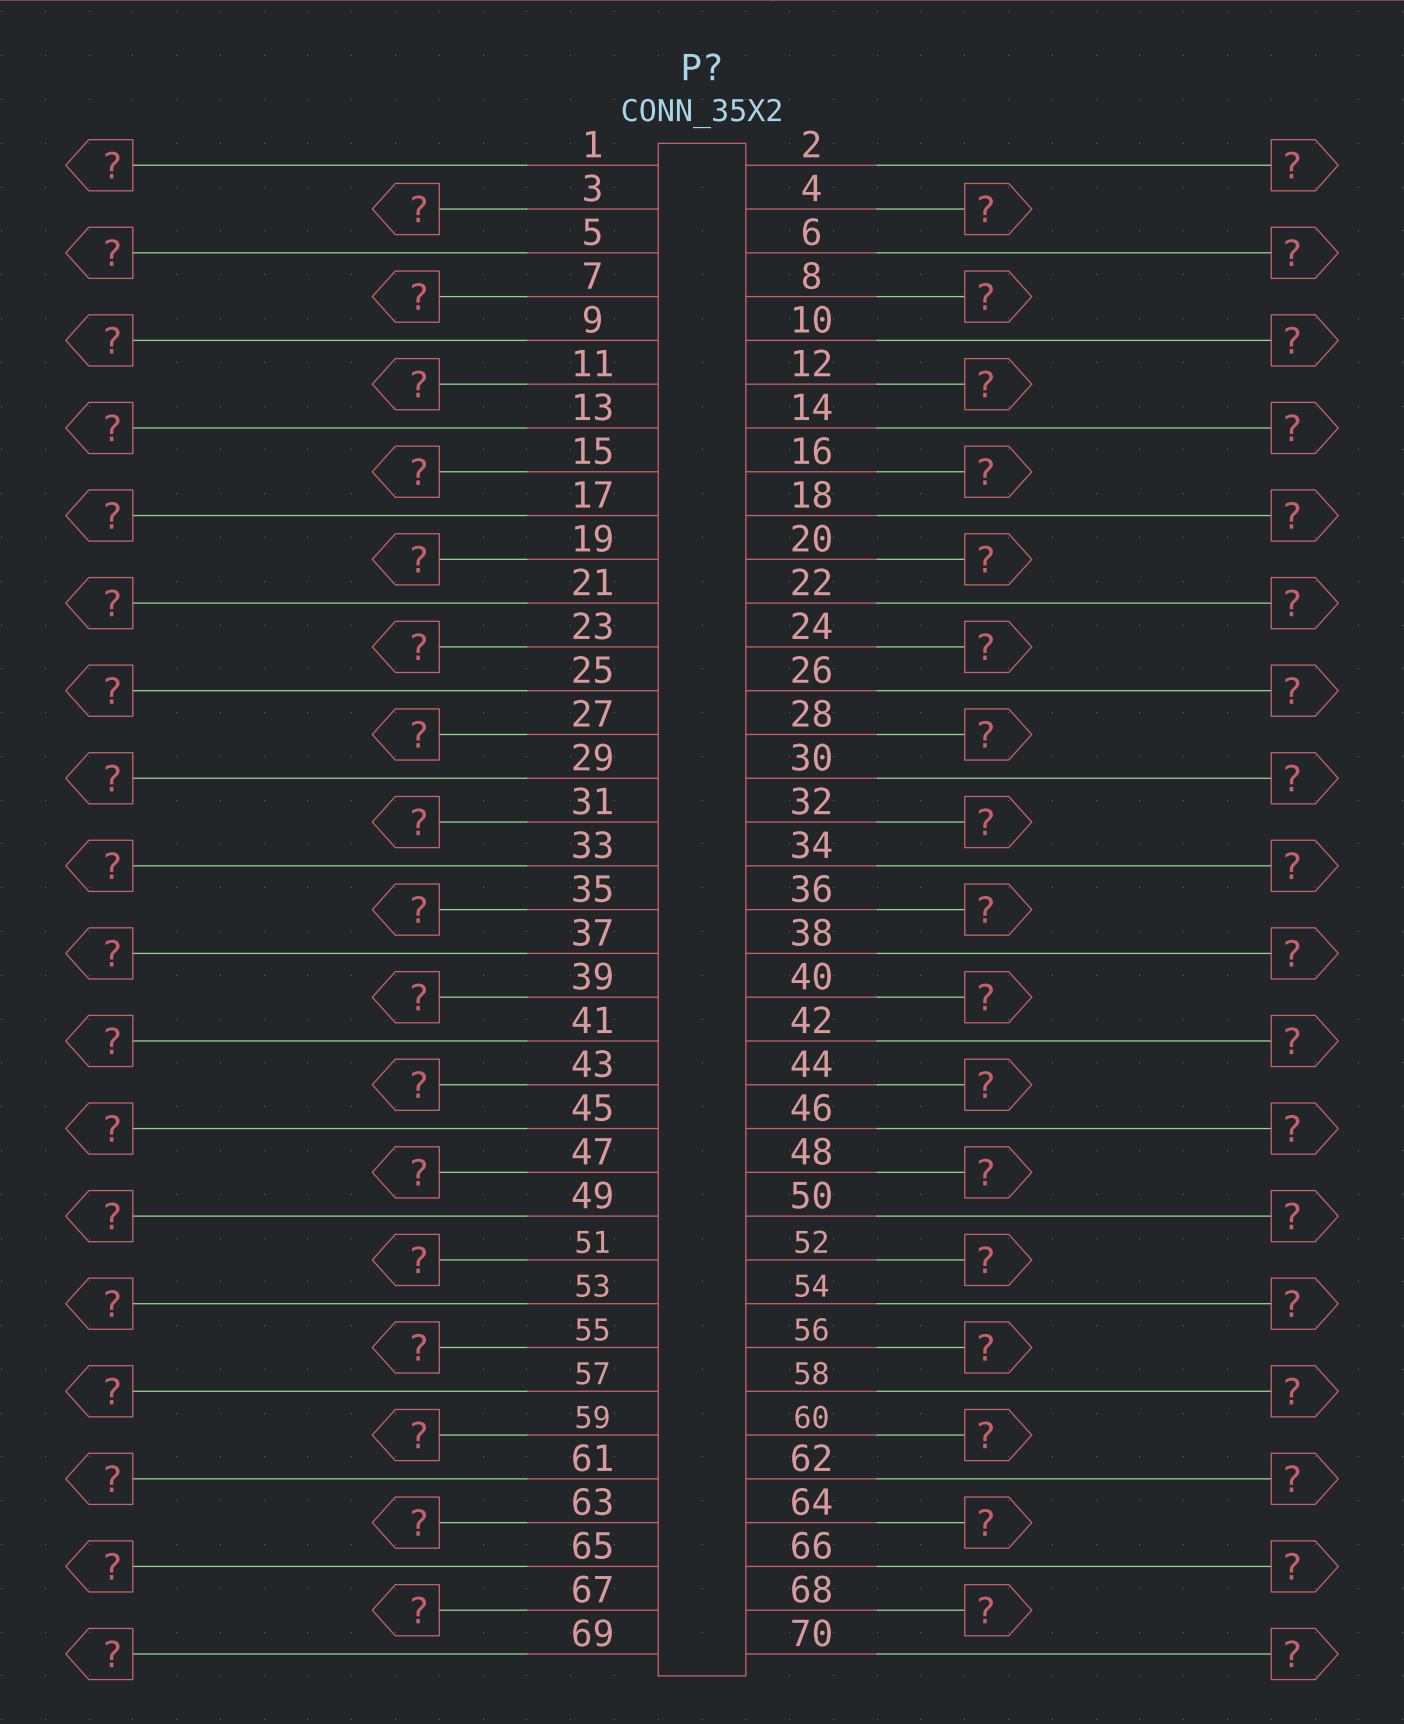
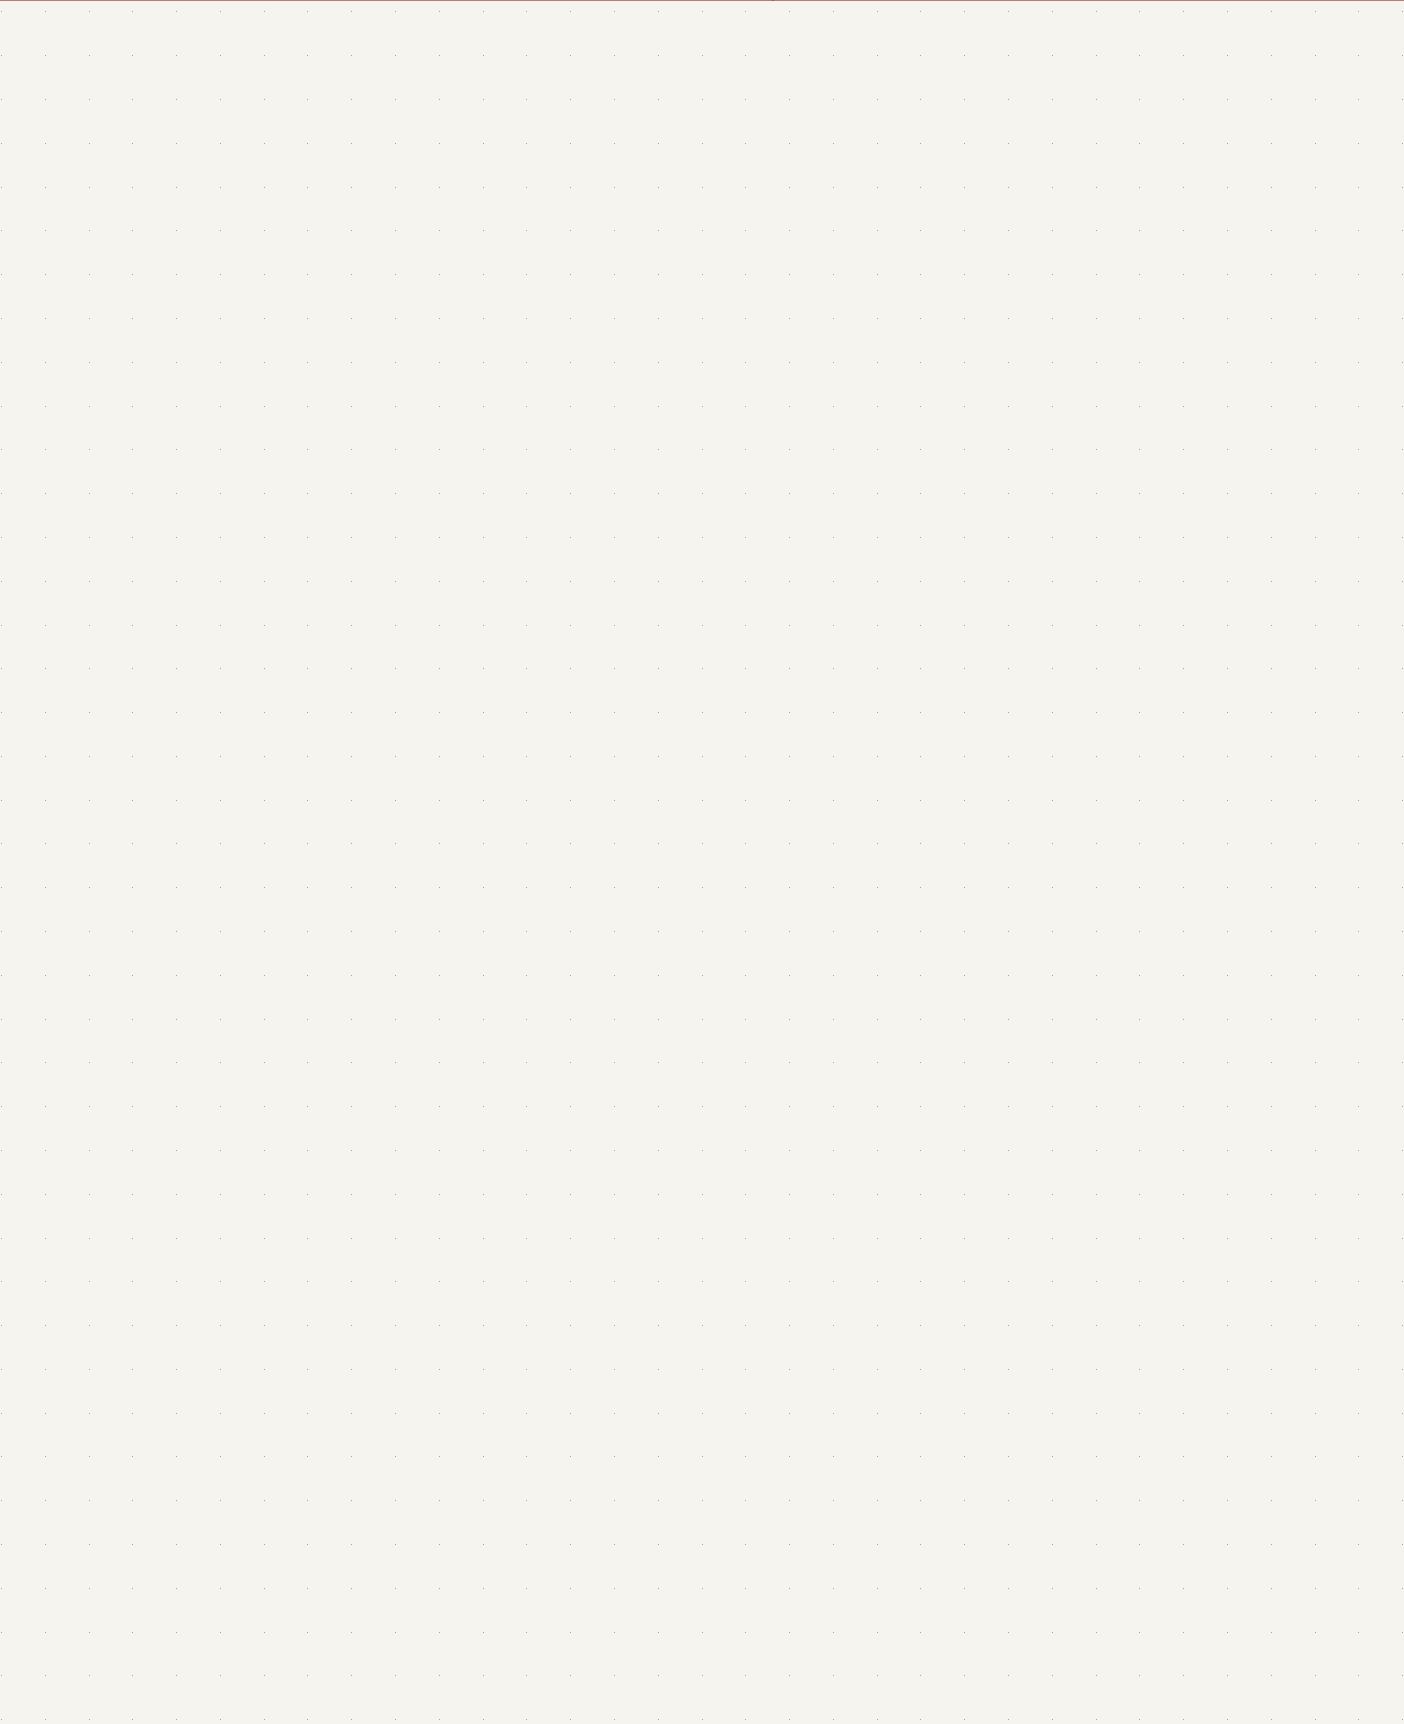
global label: ? (112, 165) -> none
wire: (132, 165) (526, 165) -> none
wire: (877, 165) (1271, 165) -> none
global label: ? (1292, 165) -> none
global label: ? (419, 208) -> none
global label: ? (985, 208) -> none
wire: (439, 209) (526, 209) -> none
wire: (877, 209) (964, 209) -> none
global label: ? (112, 252) -> none
wire: (132, 252) (526, 252) -> none
wire: (877, 252) (1271, 252) -> none
global label: ? (1292, 252) -> none
global label: ? (419, 296) -> none
wire: (439, 296) (526, 296) -> none
wire: (877, 296) (964, 296) -> none
global label: ? (985, 296) -> none
global label: ? (112, 340) -> none
wire: (132, 340) (526, 340) -> none
wire: (877, 340) (1271, 340) -> none
global label: ? (1292, 340) -> none
global label: ? (419, 383) -> none
global label: ? (985, 383) -> none
wire: (439, 384) (526, 384) -> none
wire: (877, 384) (964, 384) -> none
global label: ? (112, 427) -> none
wire: (132, 427) (526, 427) -> none
wire: (877, 427) (1271, 427) -> none
global label: ? (1292, 427) -> none
global label: ? (419, 471) -> none
wire: (439, 471) (526, 471) -> none
wire: (877, 471) (964, 471) -> none
global label: ? (985, 471) -> none
global label: ? (112, 515) -> none
wire: (132, 515) (526, 515) -> none
wire: (877, 515) (1271, 515) -> none
global label: ? (1292, 515) -> none
global label: ? (419, 559) -> none
wire: (439, 559) (526, 559) -> none
wire: (877, 559) (964, 559) -> none
global label: ? (985, 559) -> none
global label: ? (112, 602) -> none
global label: ? (1292, 602) -> none
wire: (132, 603) (526, 603) -> none
wire: (877, 603) (1271, 603) -> none
global label: ? (419, 646) -> none
wire: (439, 646) (526, 646) -> none
wire: (877, 646) (964, 646) -> none
global label: ? (985, 646) -> none
global label: ? (112, 690) -> none
wire: (132, 690) (526, 690) -> none
wire: (877, 690) (1271, 690) -> none
global label: ? (1292, 690) -> none
global label: ? (419, 734) -> none
wire: (439, 734) (526, 734) -> none
wire: (877, 734) (964, 734) -> none
global label: ? (985, 734) -> none
global label: ? (112, 778) -> none
wire: (132, 778) (526, 778) -> none
wire: (877, 778) (1271, 778) -> none
global label: ? (1292, 778) -> none
global label: ? (419, 821) -> none
global label: ? (985, 821) -> none
wire: (439, 822) (526, 822) -> none
wire: (877, 822) (964, 822) -> none
global label: ? (112, 865) -> none
wire: (132, 865) (526, 865) -> none
wire: (877, 865) (1271, 865) -> none
global label: ? (1292, 865) -> none
global label: ? (419, 909) -> none
wire: (439, 909) (526, 909) -> none
P?: CONN_35X2 (702, 909) -> none
wire: (877, 909) (964, 909) -> none
global label: ? (985, 909) -> none
global label: ? (112, 953) -> none
wire: (132, 953) (526, 953) -> none
wire: (877, 953) (1271, 953) -> none
global label: ? (1292, 953) -> none
global label: ? (419, 996) -> none
global label: ? (985, 996) -> none
wire: (439, 997) (526, 997) -> none
wire: (877, 997) (964, 997) -> none
global label: ? (112, 1040) -> none
wire: (132, 1040) (526, 1040) -> none
wire: (877, 1040) (1271, 1040) -> none
global label: ? (1292, 1040) -> none
global label: ? (419, 1084) -> none
wire: (439, 1084) (526, 1084) -> none
wire: (877, 1084) (964, 1084) -> none
global label: ? (985, 1084) -> none
global label: ? (112, 1128) -> none
wire: (132, 1128) (526, 1128) -> none
wire: (877, 1128) (1271, 1128) -> none
global label: ? (1292, 1128) -> none
global label: ? (419, 1172) -> none
wire: (439, 1172) (526, 1172) -> none
wire: (877, 1172) (964, 1172) -> none
global label: ? (985, 1172) -> none
global label: ? (112, 1215) -> none
global label: ? (1292, 1215) -> none
wire: (132, 1216) (526, 1216) -> none
wire: (877, 1216) (1271, 1216) -> none
global label: ? (419, 1259) -> none
wire: (439, 1259) (526, 1259) -> none
wire: (877, 1259) (964, 1259) -> none
global label: ? (985, 1259) -> none
global label: ? (112, 1303) -> none
wire: (132, 1303) (526, 1303) -> none
wire: (877, 1303) (1271, 1303) -> none
global label: ? (1292, 1303) -> none
global label: ? (419, 1347) -> none
wire: (439, 1347) (526, 1347) -> none
wire: (877, 1347) (964, 1347) -> none
global label: ? (985, 1347) -> none
global label: ? (112, 1391) -> none
wire: (132, 1391) (526, 1391) -> none
wire: (877, 1391) (1271, 1391) -> none
global label: ? (1292, 1391) -> none
global label: ? (419, 1434) -> none
global label: ? (985, 1434) -> none
wire: (439, 1435) (526, 1435) -> none
wire: (877, 1435) (964, 1435) -> none
global label: ? (112, 1478) -> none
wire: (132, 1478) (526, 1478) -> none
wire: (877, 1478) (1271, 1478) -> none
global label: ? (1292, 1478) -> none
global label: ? (419, 1522) -> none
wire: (439, 1522) (526, 1522) -> none
wire: (877, 1522) (964, 1522) -> none
global label: ? (985, 1522) -> none
global label: ? (112, 1566) -> none
wire: (132, 1566) (526, 1566) -> none
wire: (877, 1566) (1271, 1566) -> none
global label: ? (1292, 1566) -> none
global label: ? (419, 1609) -> none
global label: ? (985, 1609) -> none
wire: (439, 1610) (526, 1610) -> none
wire: (877, 1610) (964, 1610) -> none
global label: ? (112, 1653) -> none
wire: (132, 1653) (526, 1653) -> none
wire: (877, 1653) (1271, 1653) -> none
global label: ? (1292, 1653) -> none

